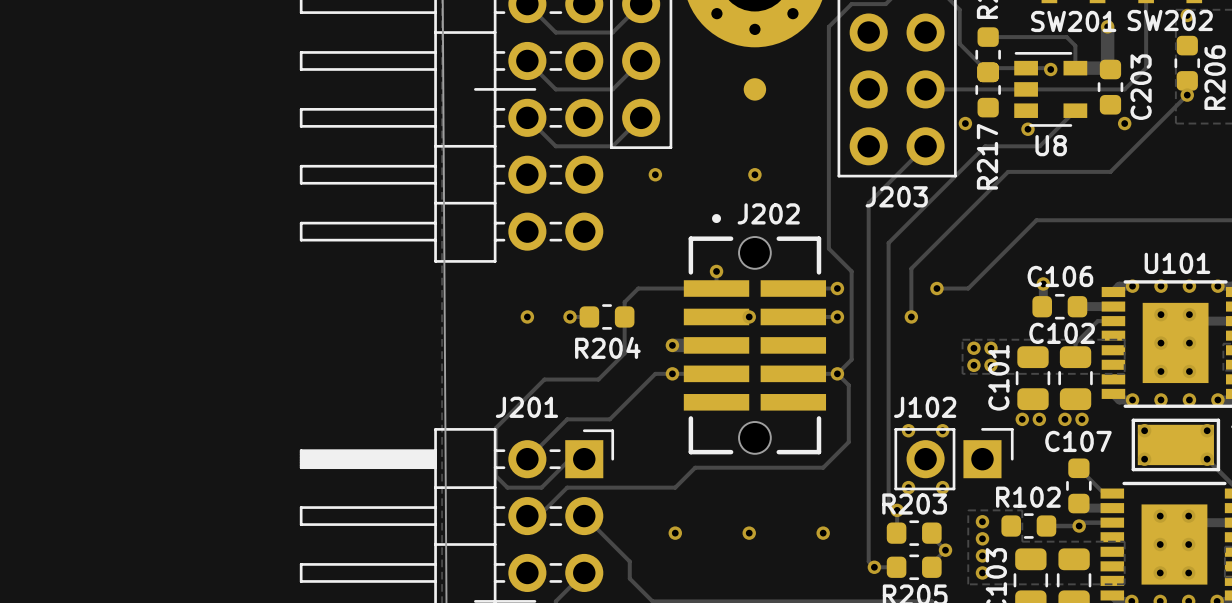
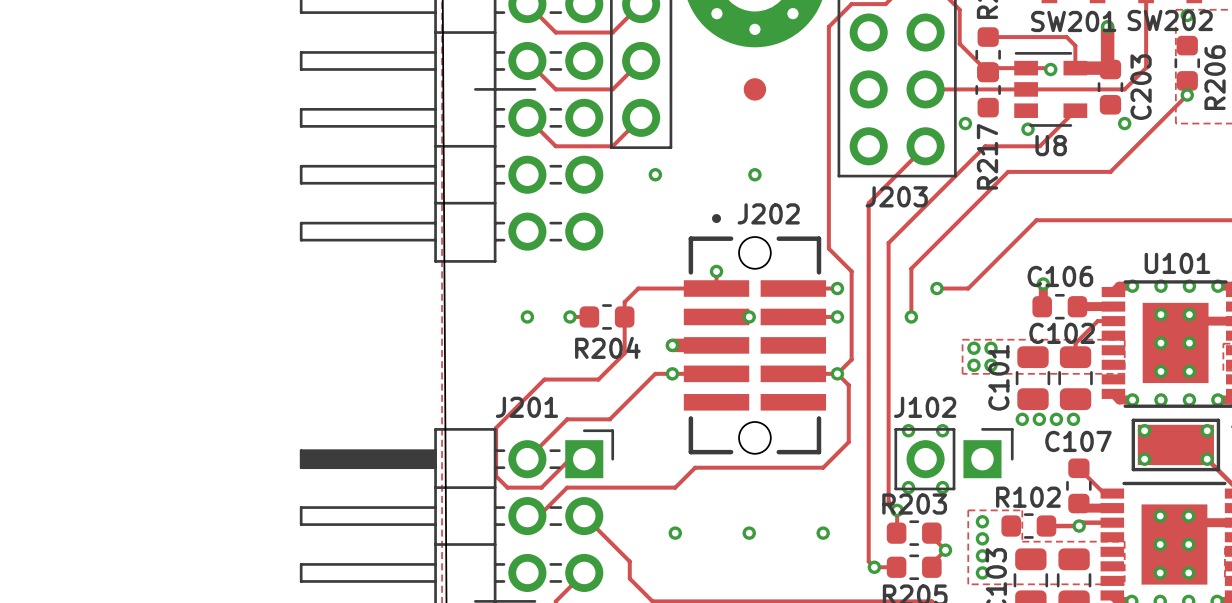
via: none -> (1056, 419)
via: (1064, 419) -> none
via: none -> (1073, 419)
via: (1082, 419) -> none

